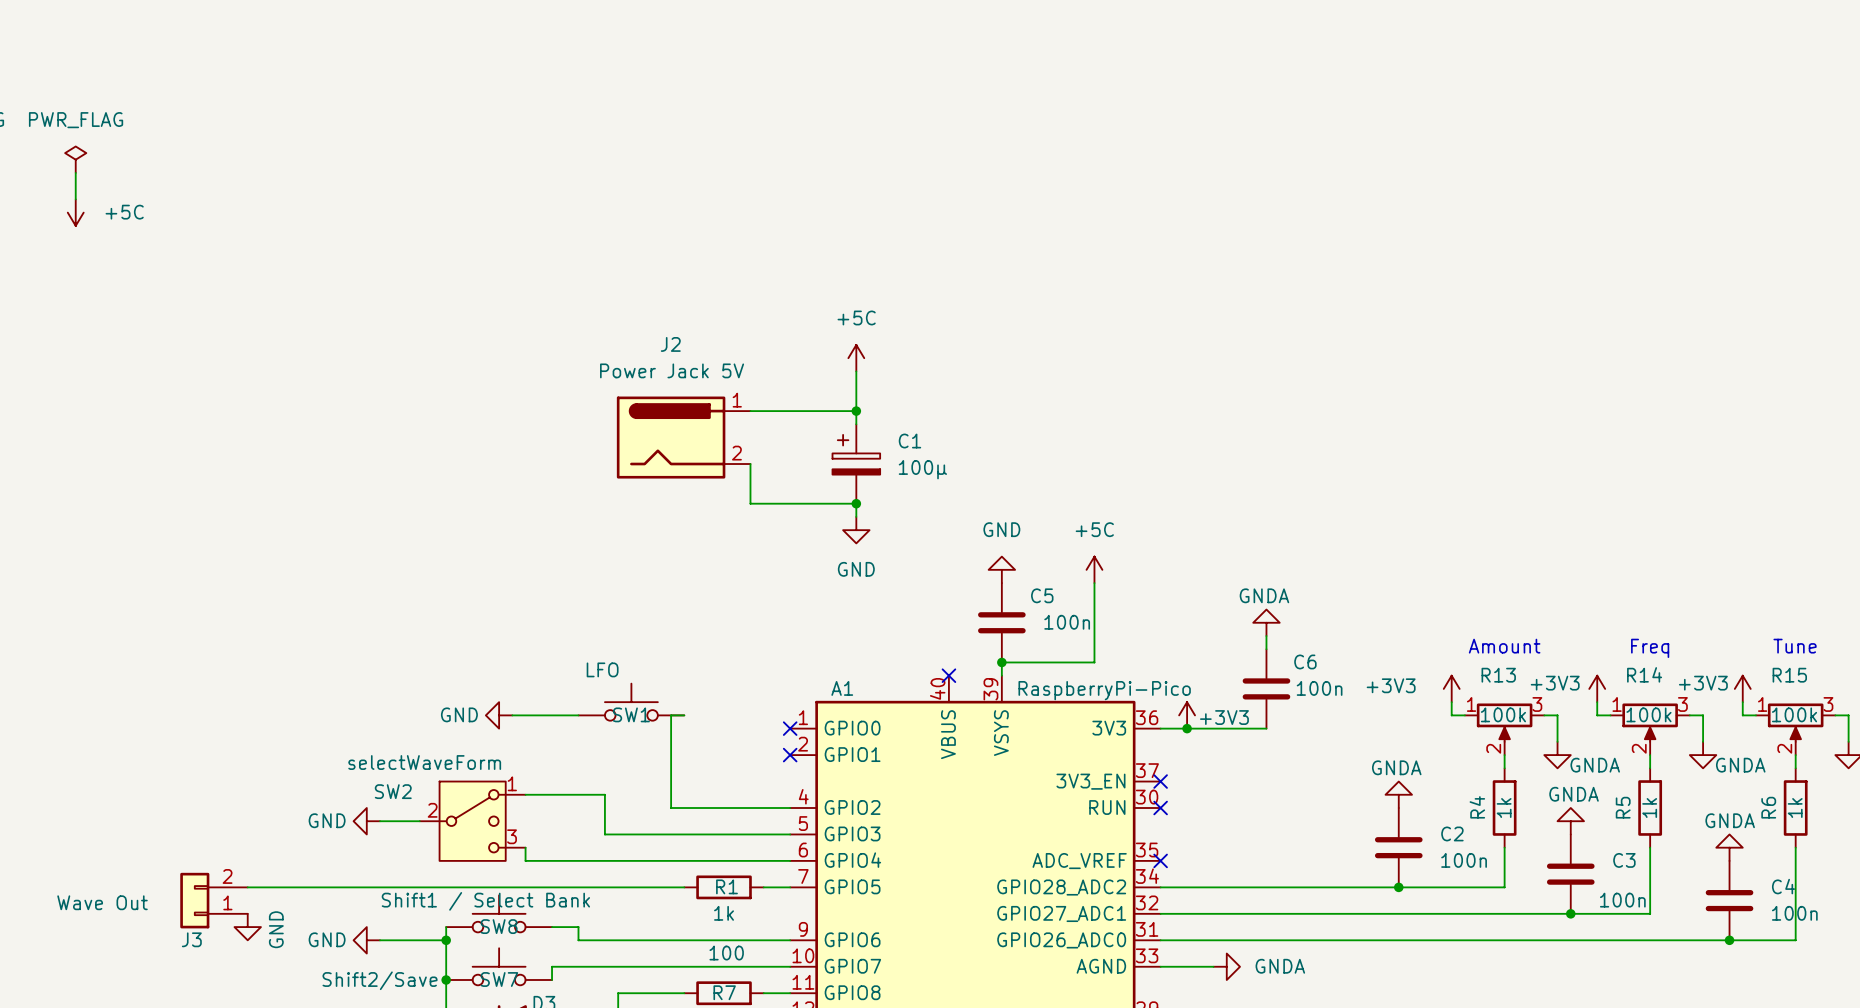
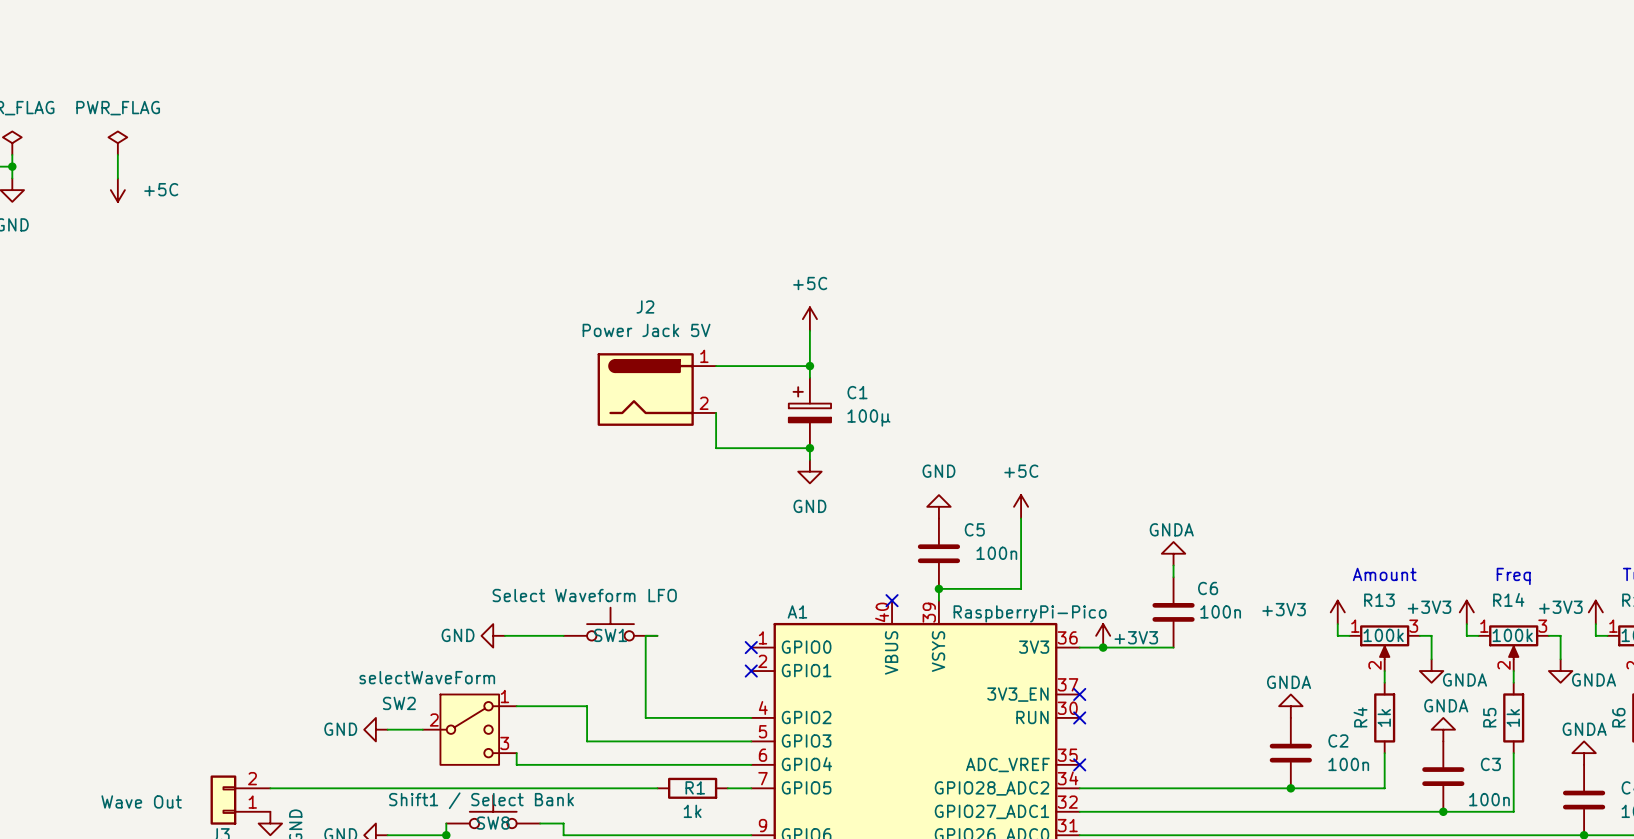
SW1 value: LFO (602, 669) -> Select Waveform LFO (584, 595)

